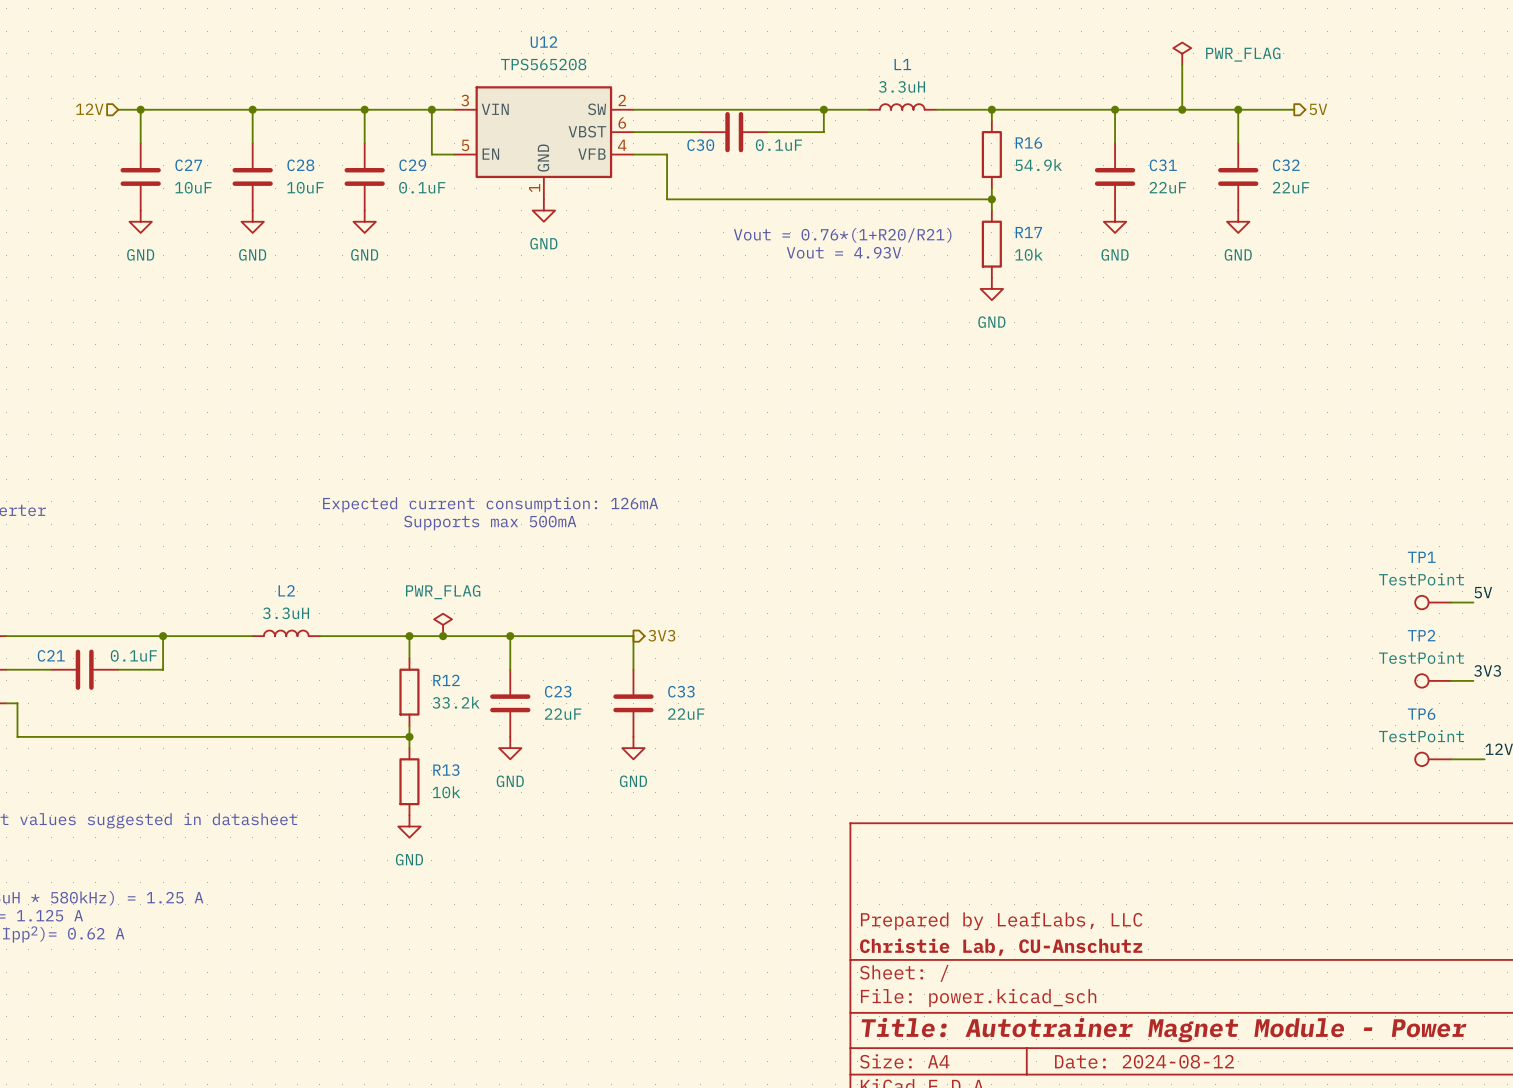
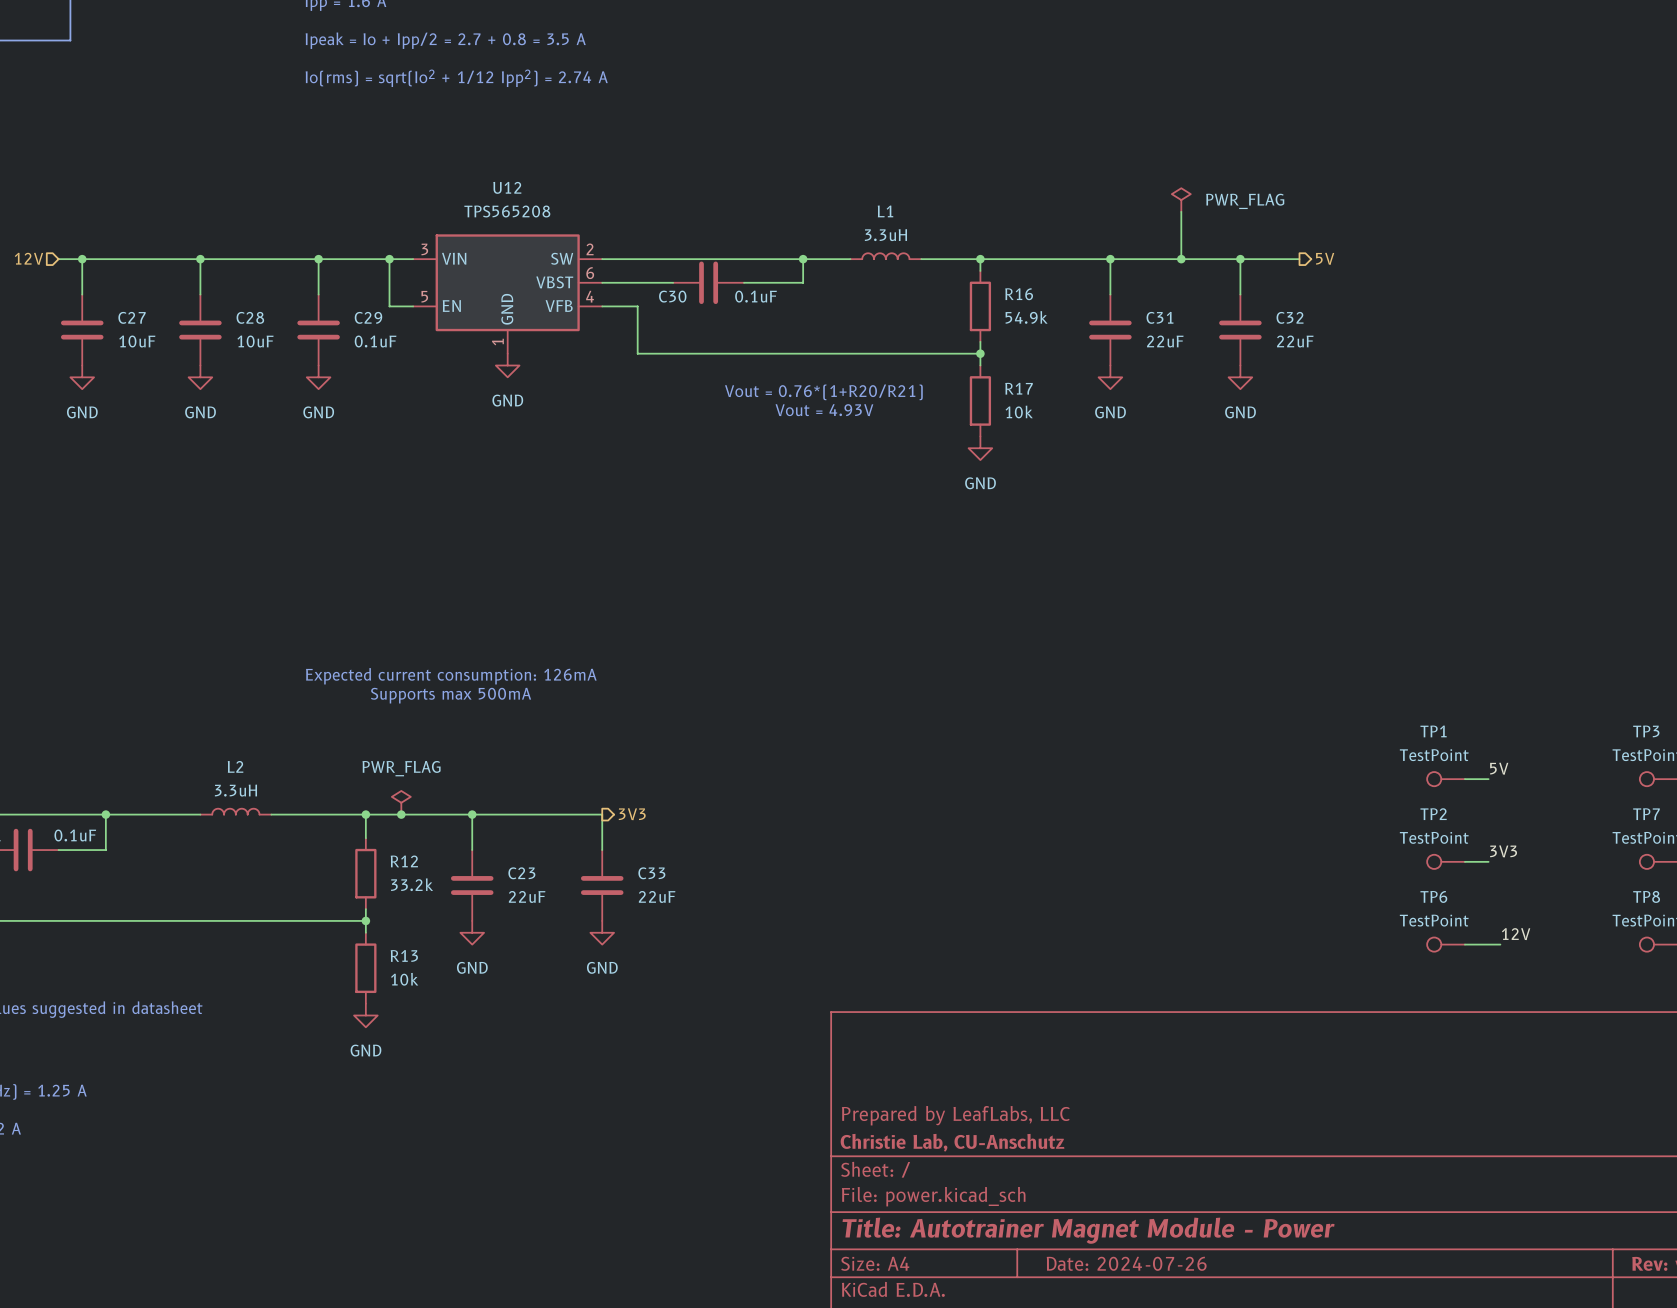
title block: Date: 2024-08-12 (1144, 1061) -> Date: 2024-07-26 (1126, 1263)

